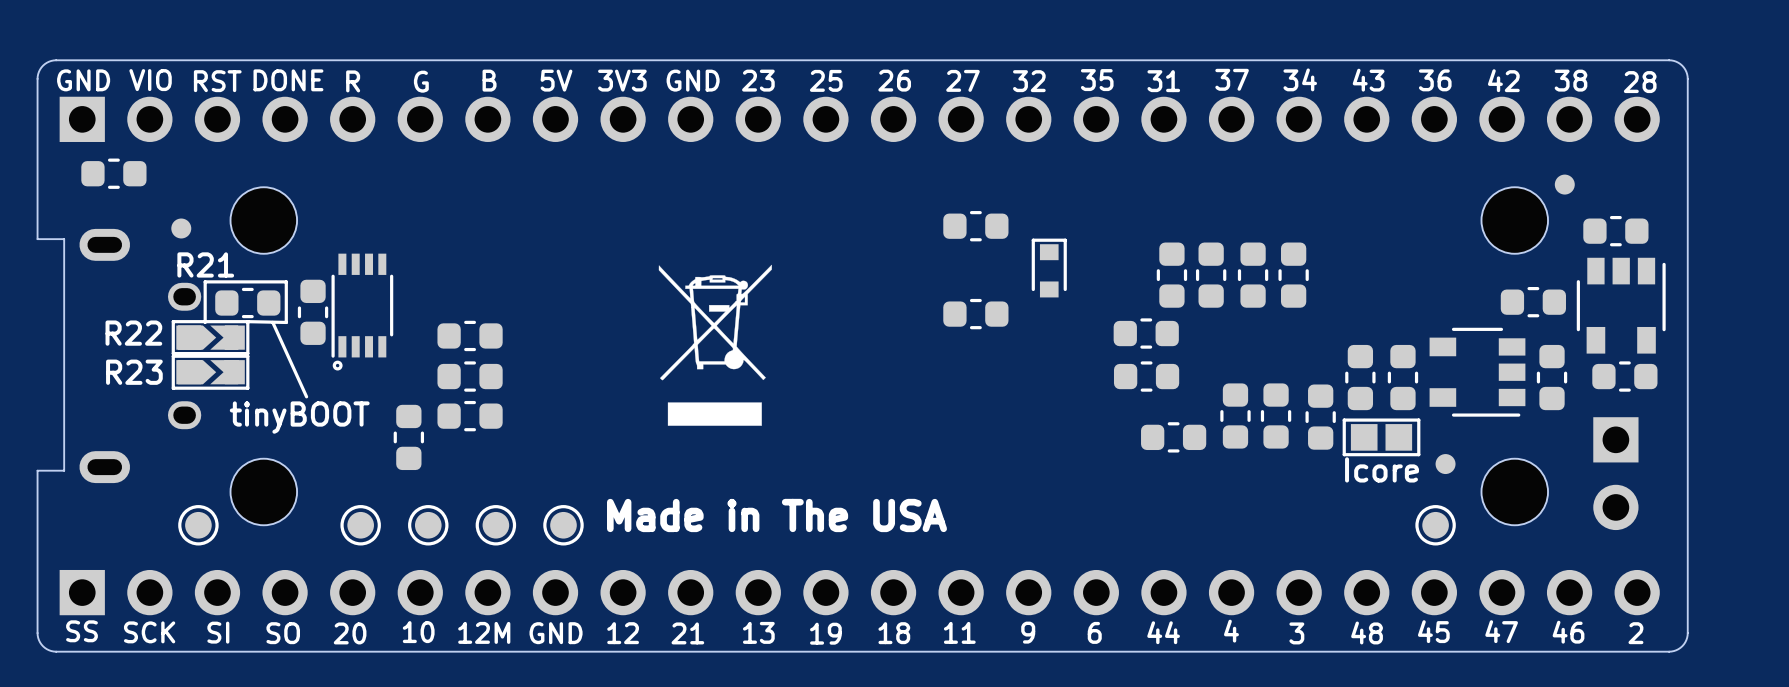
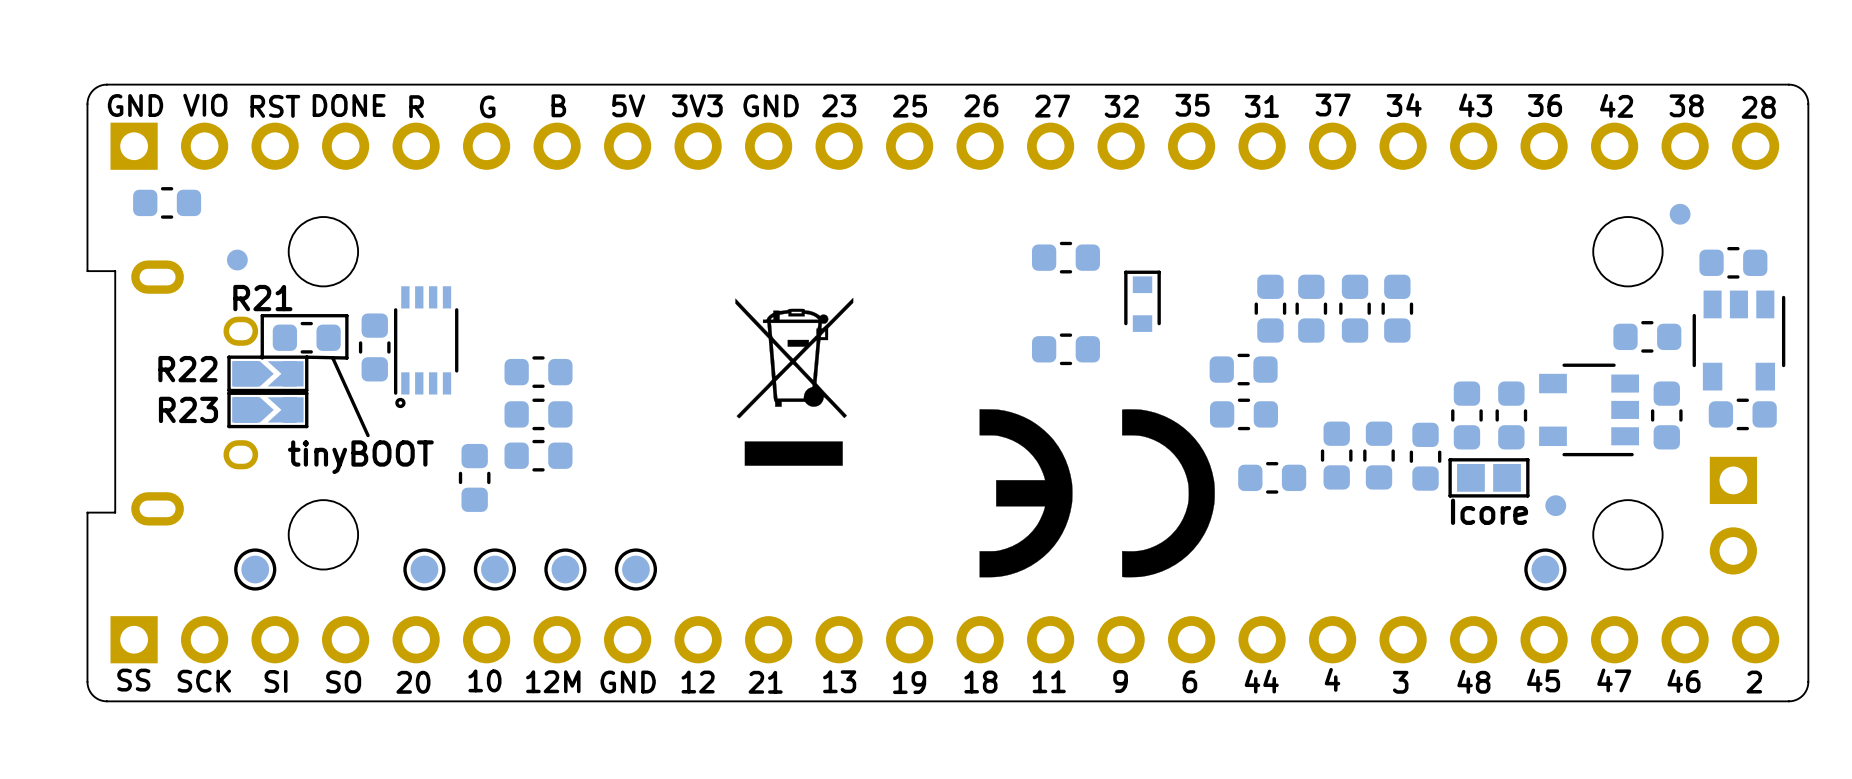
drawing: none -> [979, 409, 1215, 578]
text: Made in The USA (776, 515) -> none

